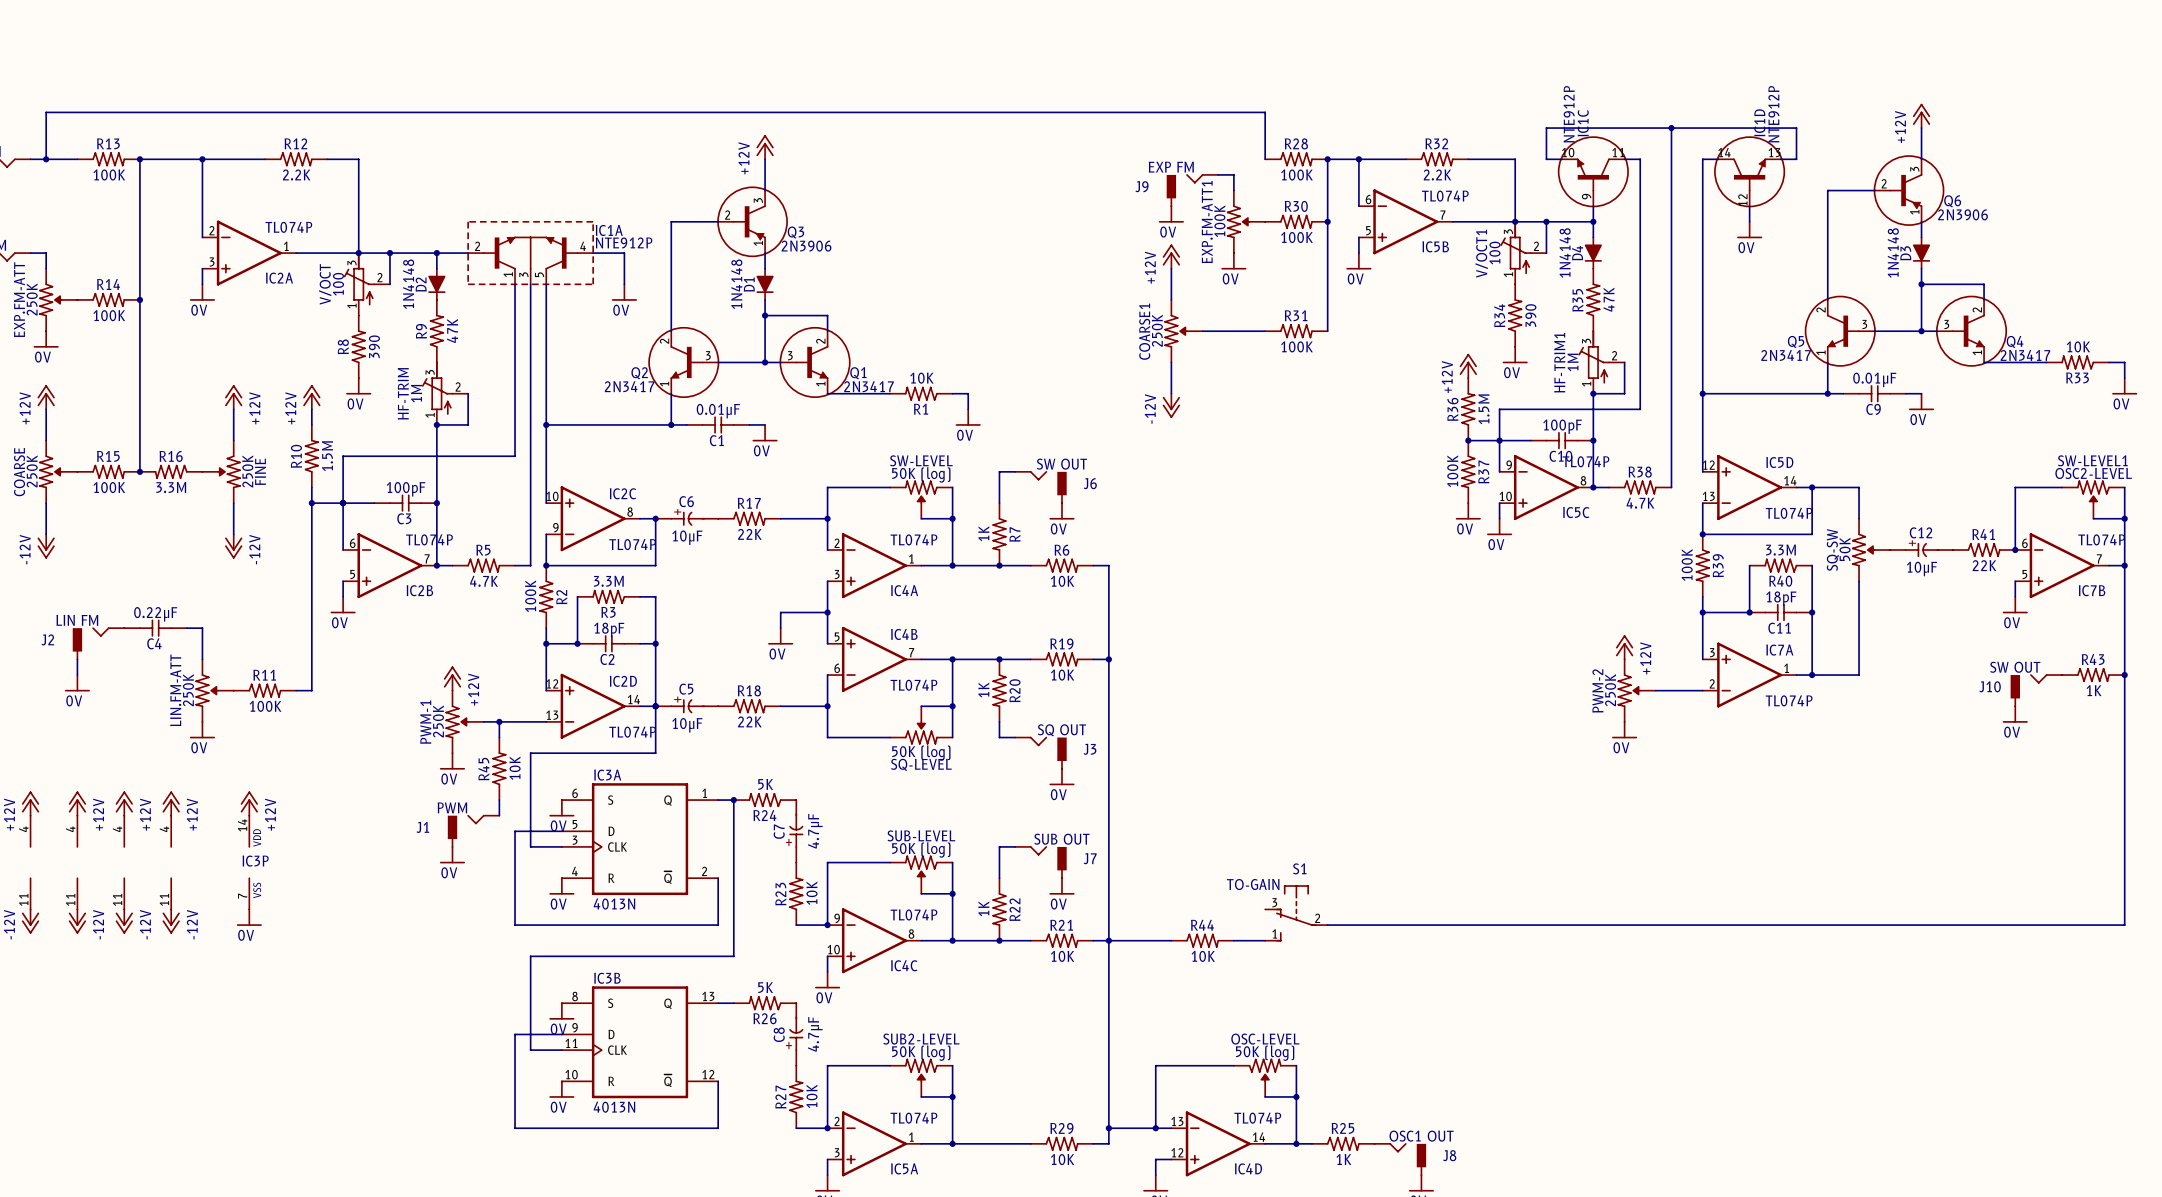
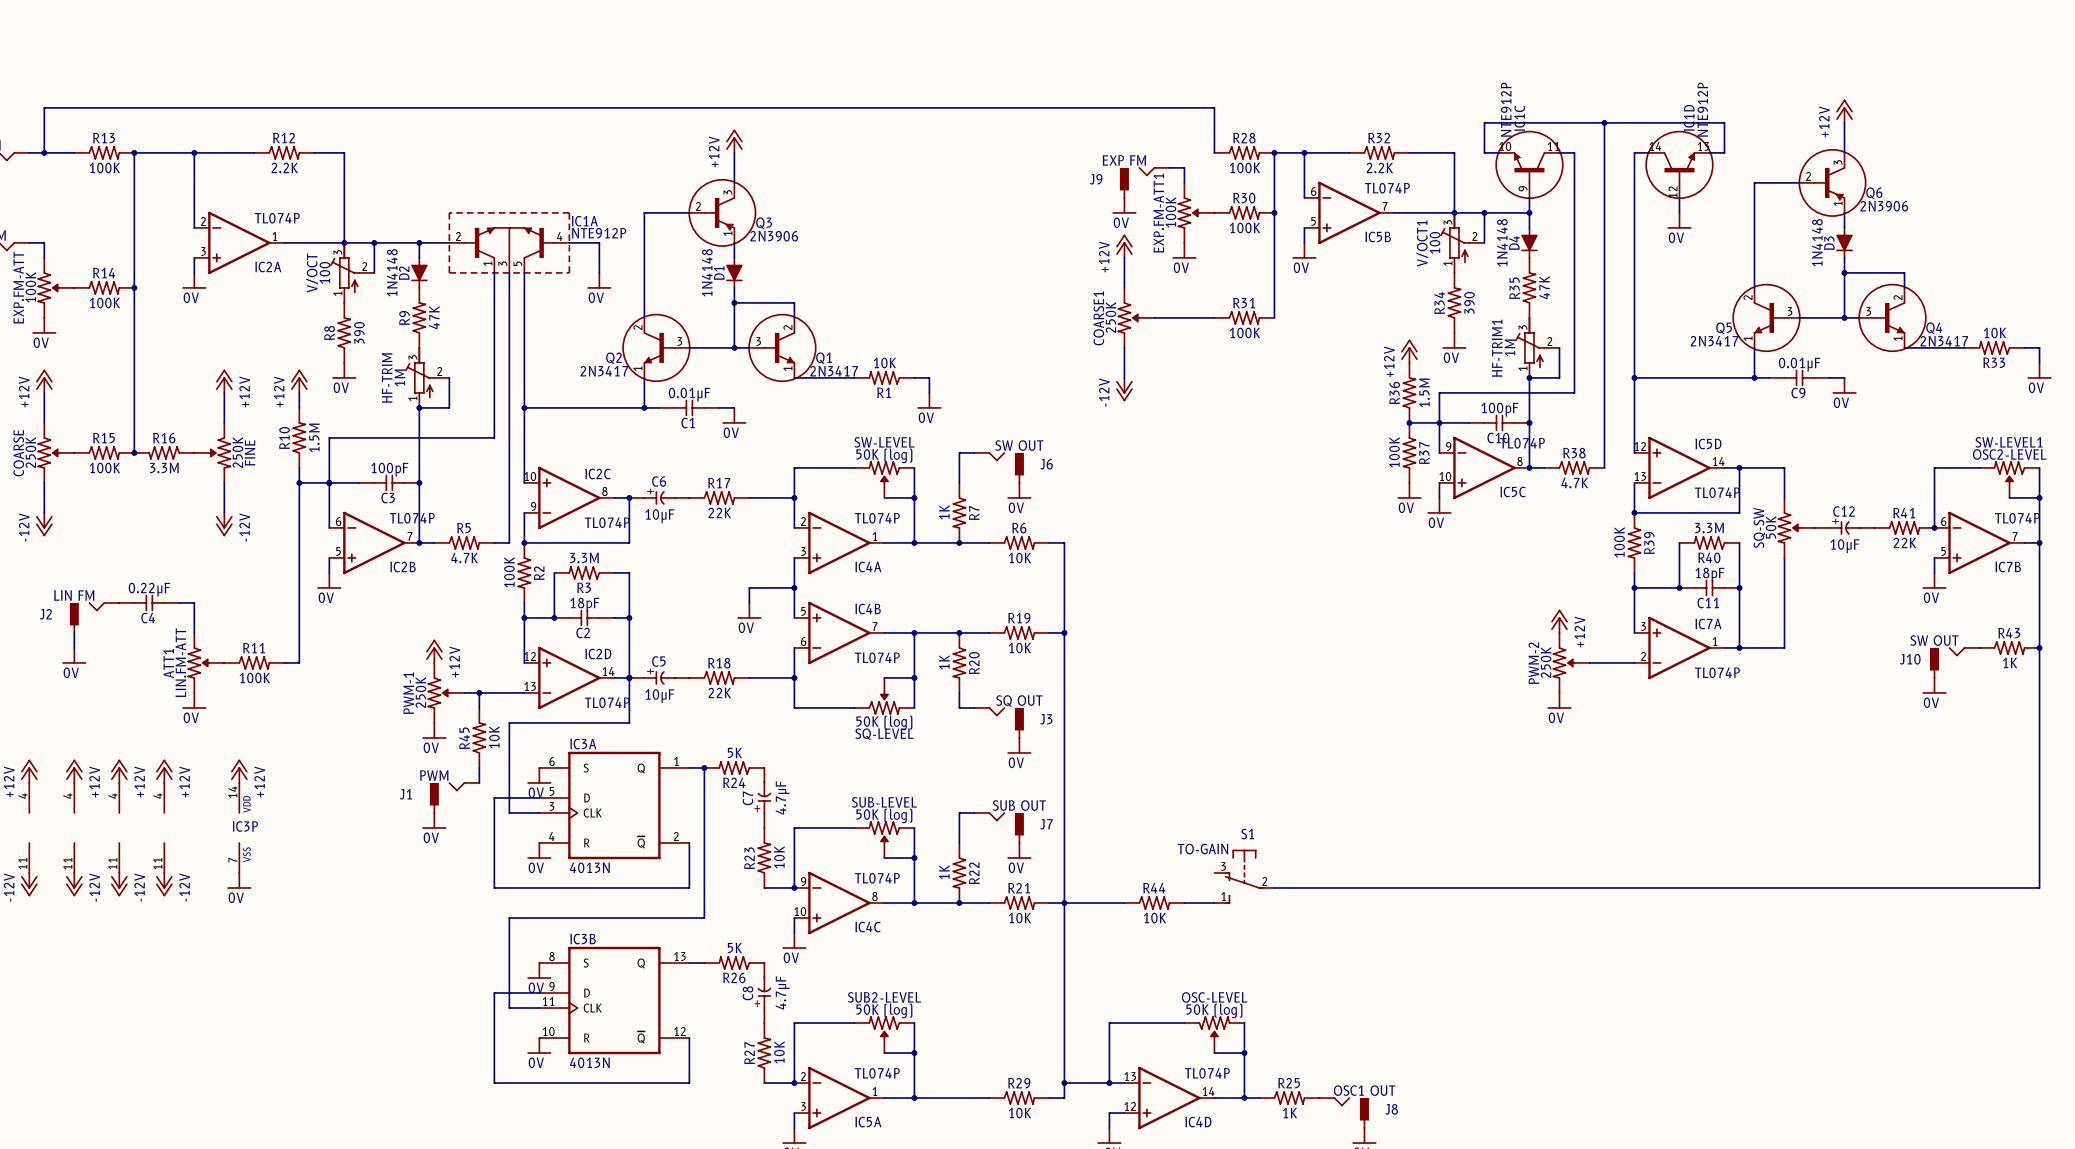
EXP.FM-ATT value: 250K (32, 299) -> 100K (30, 287)
LIN.FM-ATT name: LIN.FM-ATT (175, 690) -> ATT1 (168, 663)
LIN.FM-ATT value: 250K (188, 690) -> LIN.FM-ATT (180, 662)

